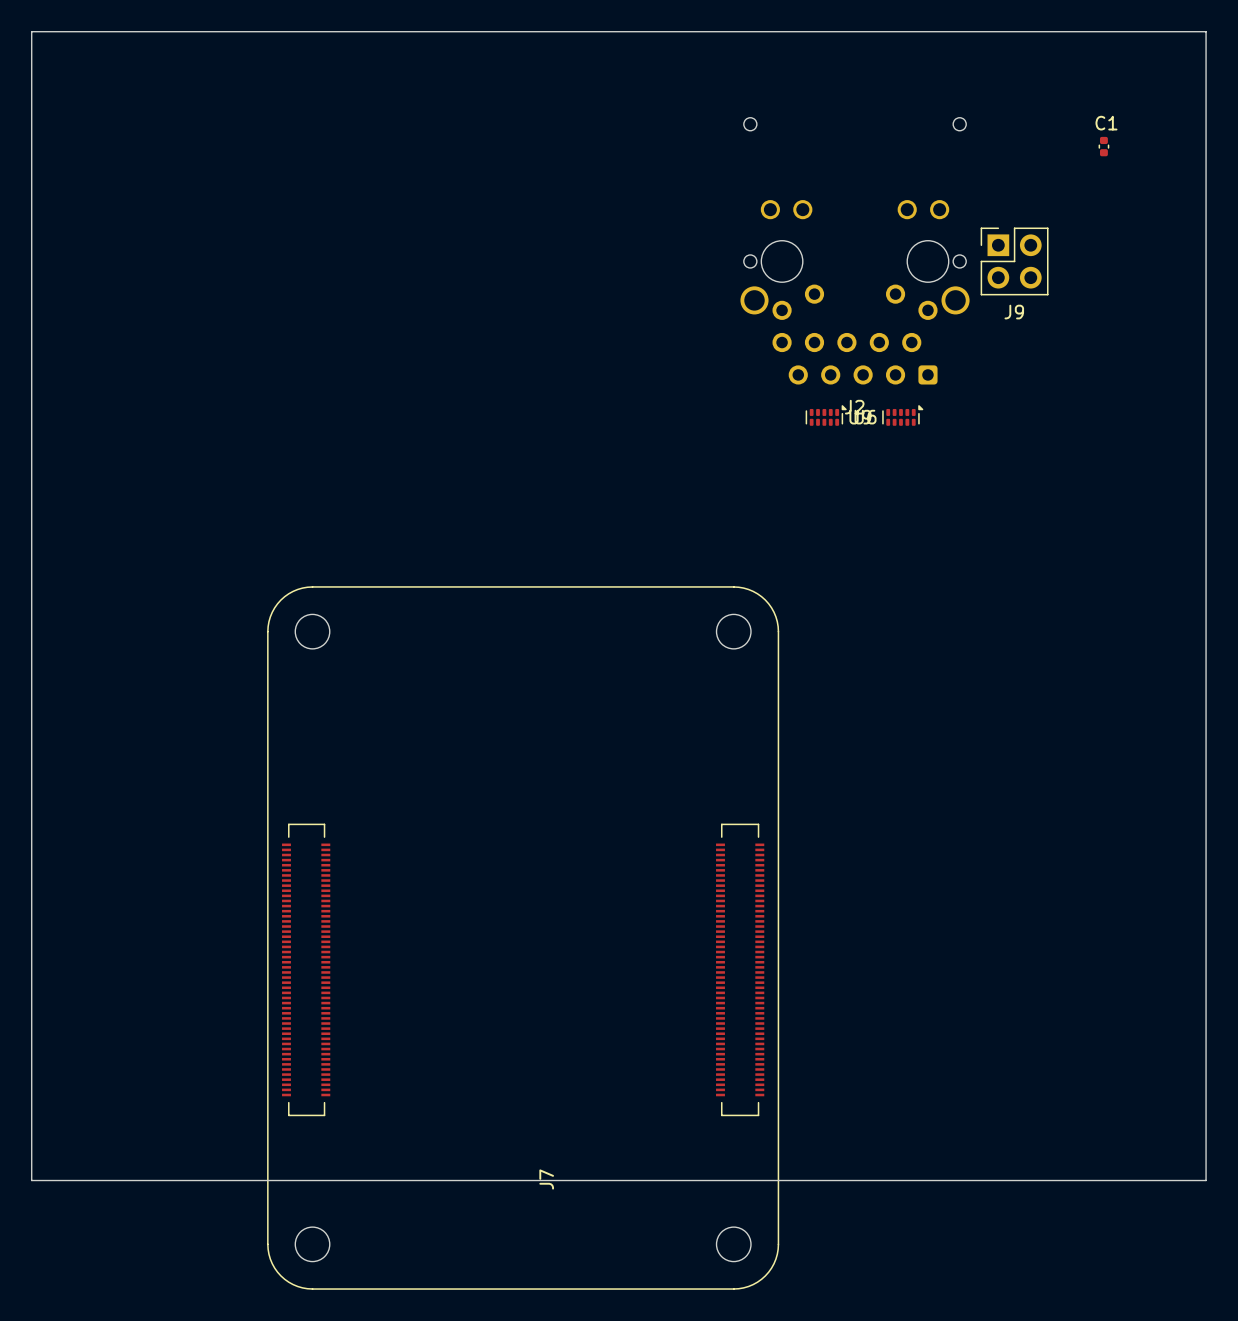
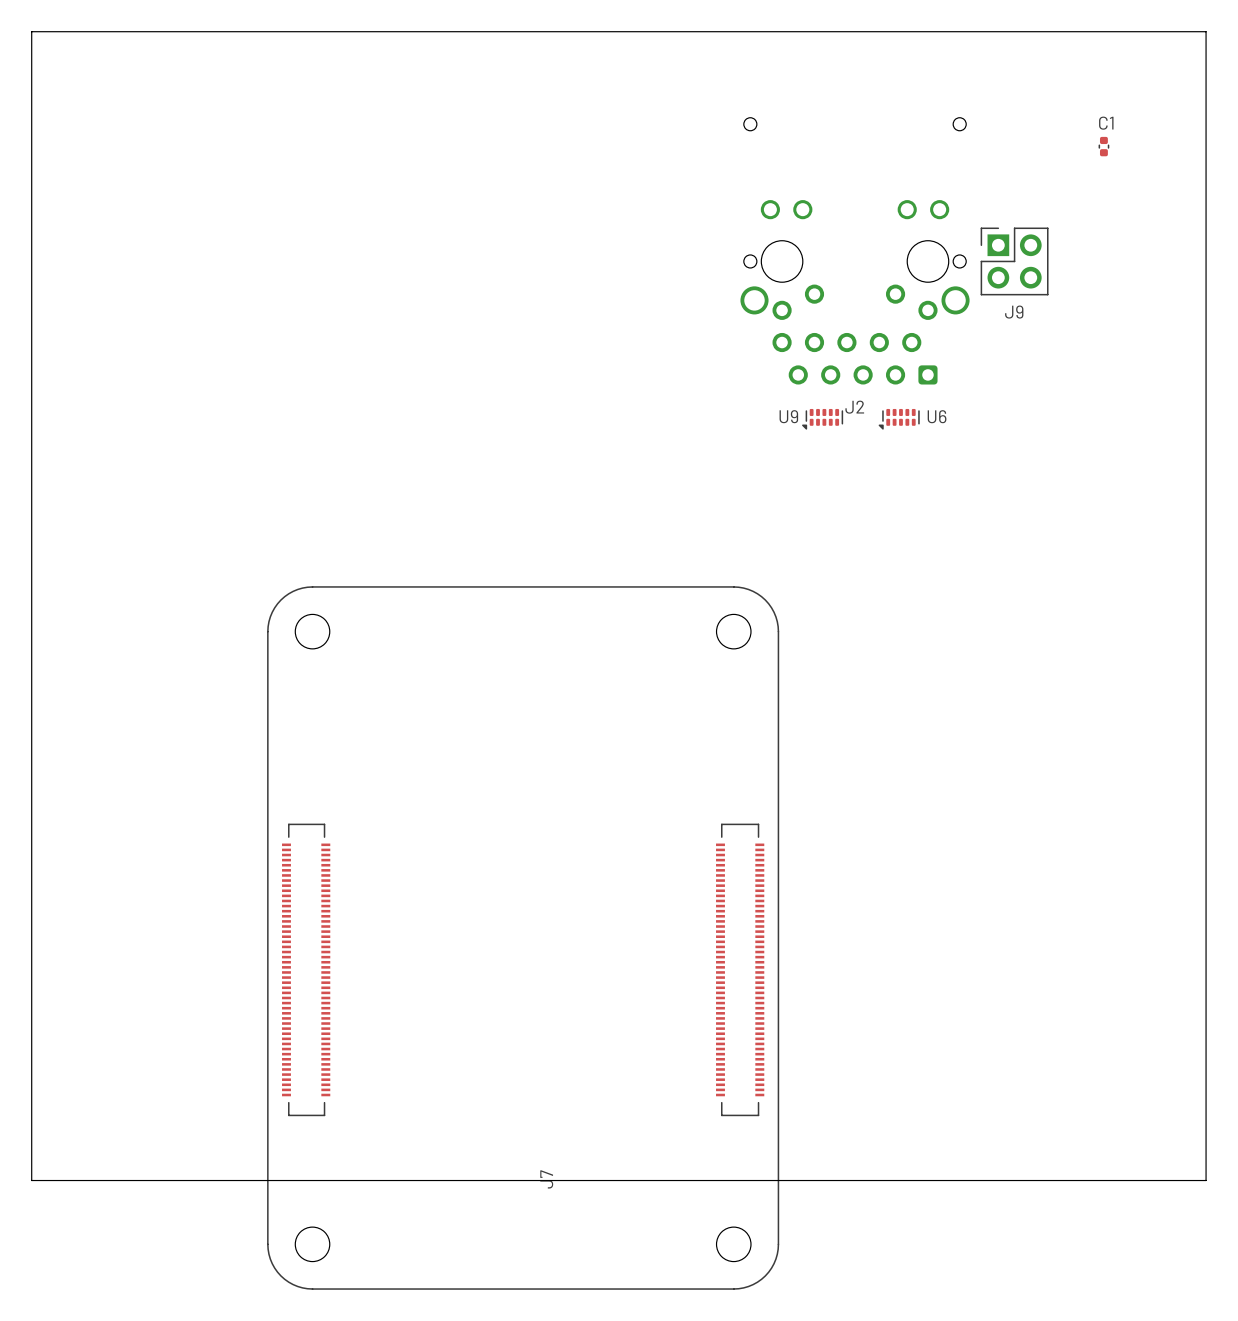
U9 rotation: 0° (826, 415) -> 180° (822, 419)
U6 rotation: 0° (902, 415) -> 180° (899, 419)

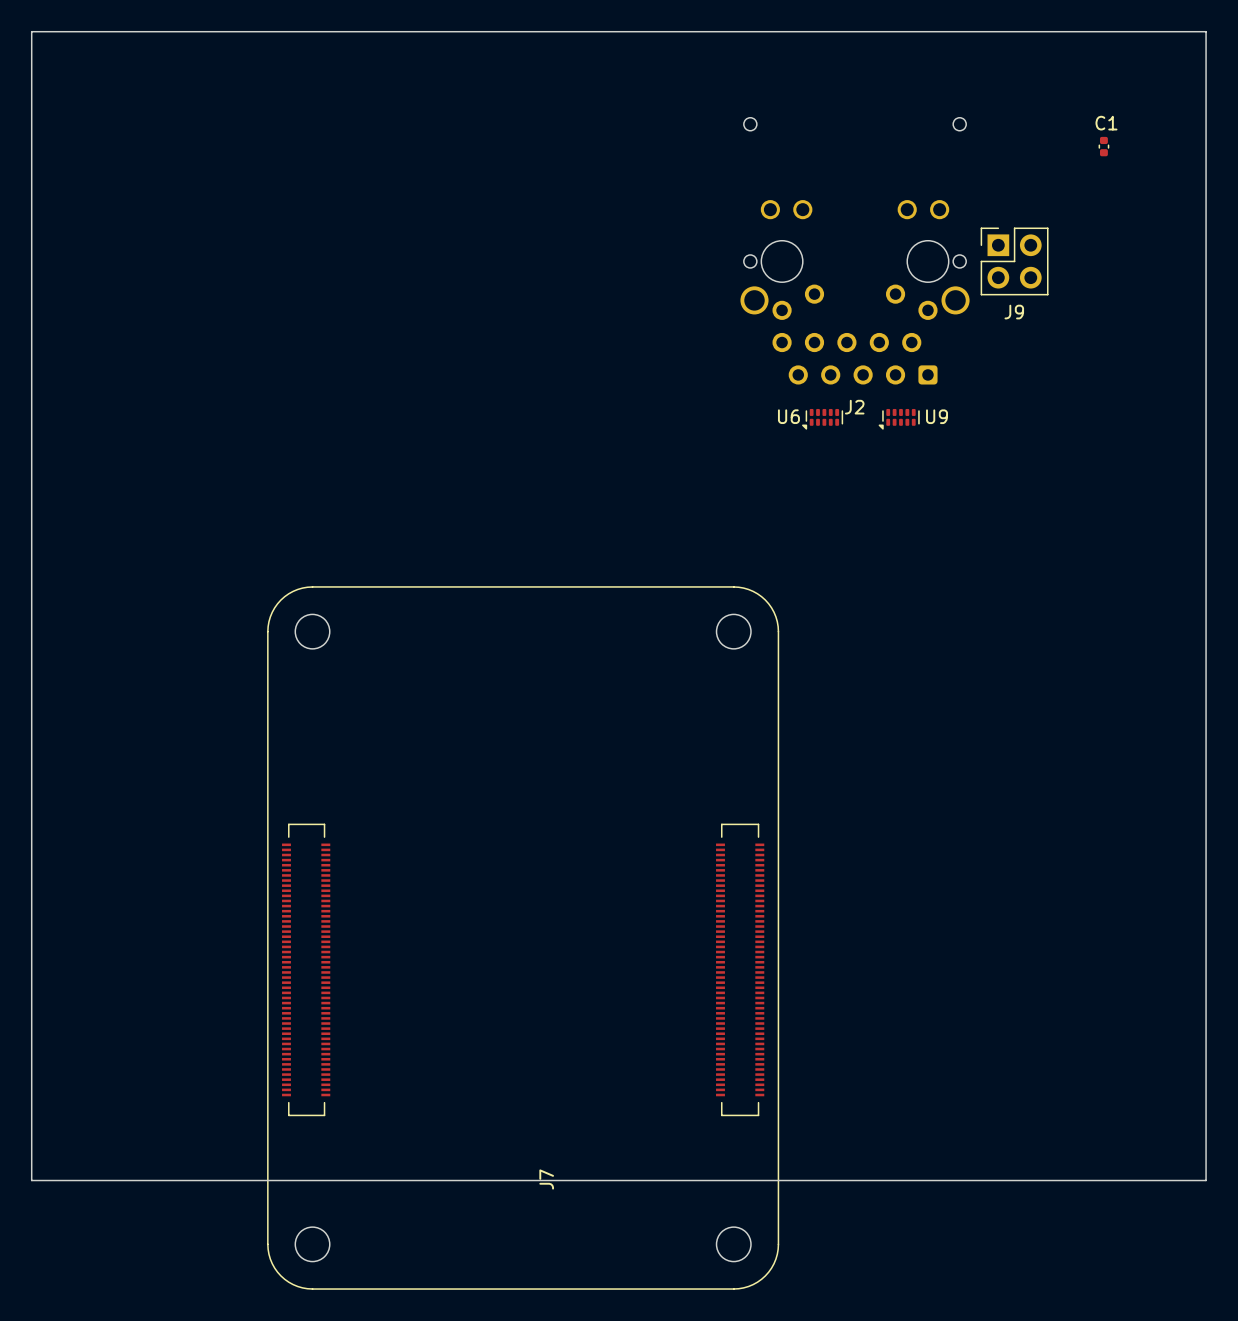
U9 name: U9 (788, 416) -> U6 (788, 416)
U6 name: U6 (937, 416) -> U9 (937, 416)

